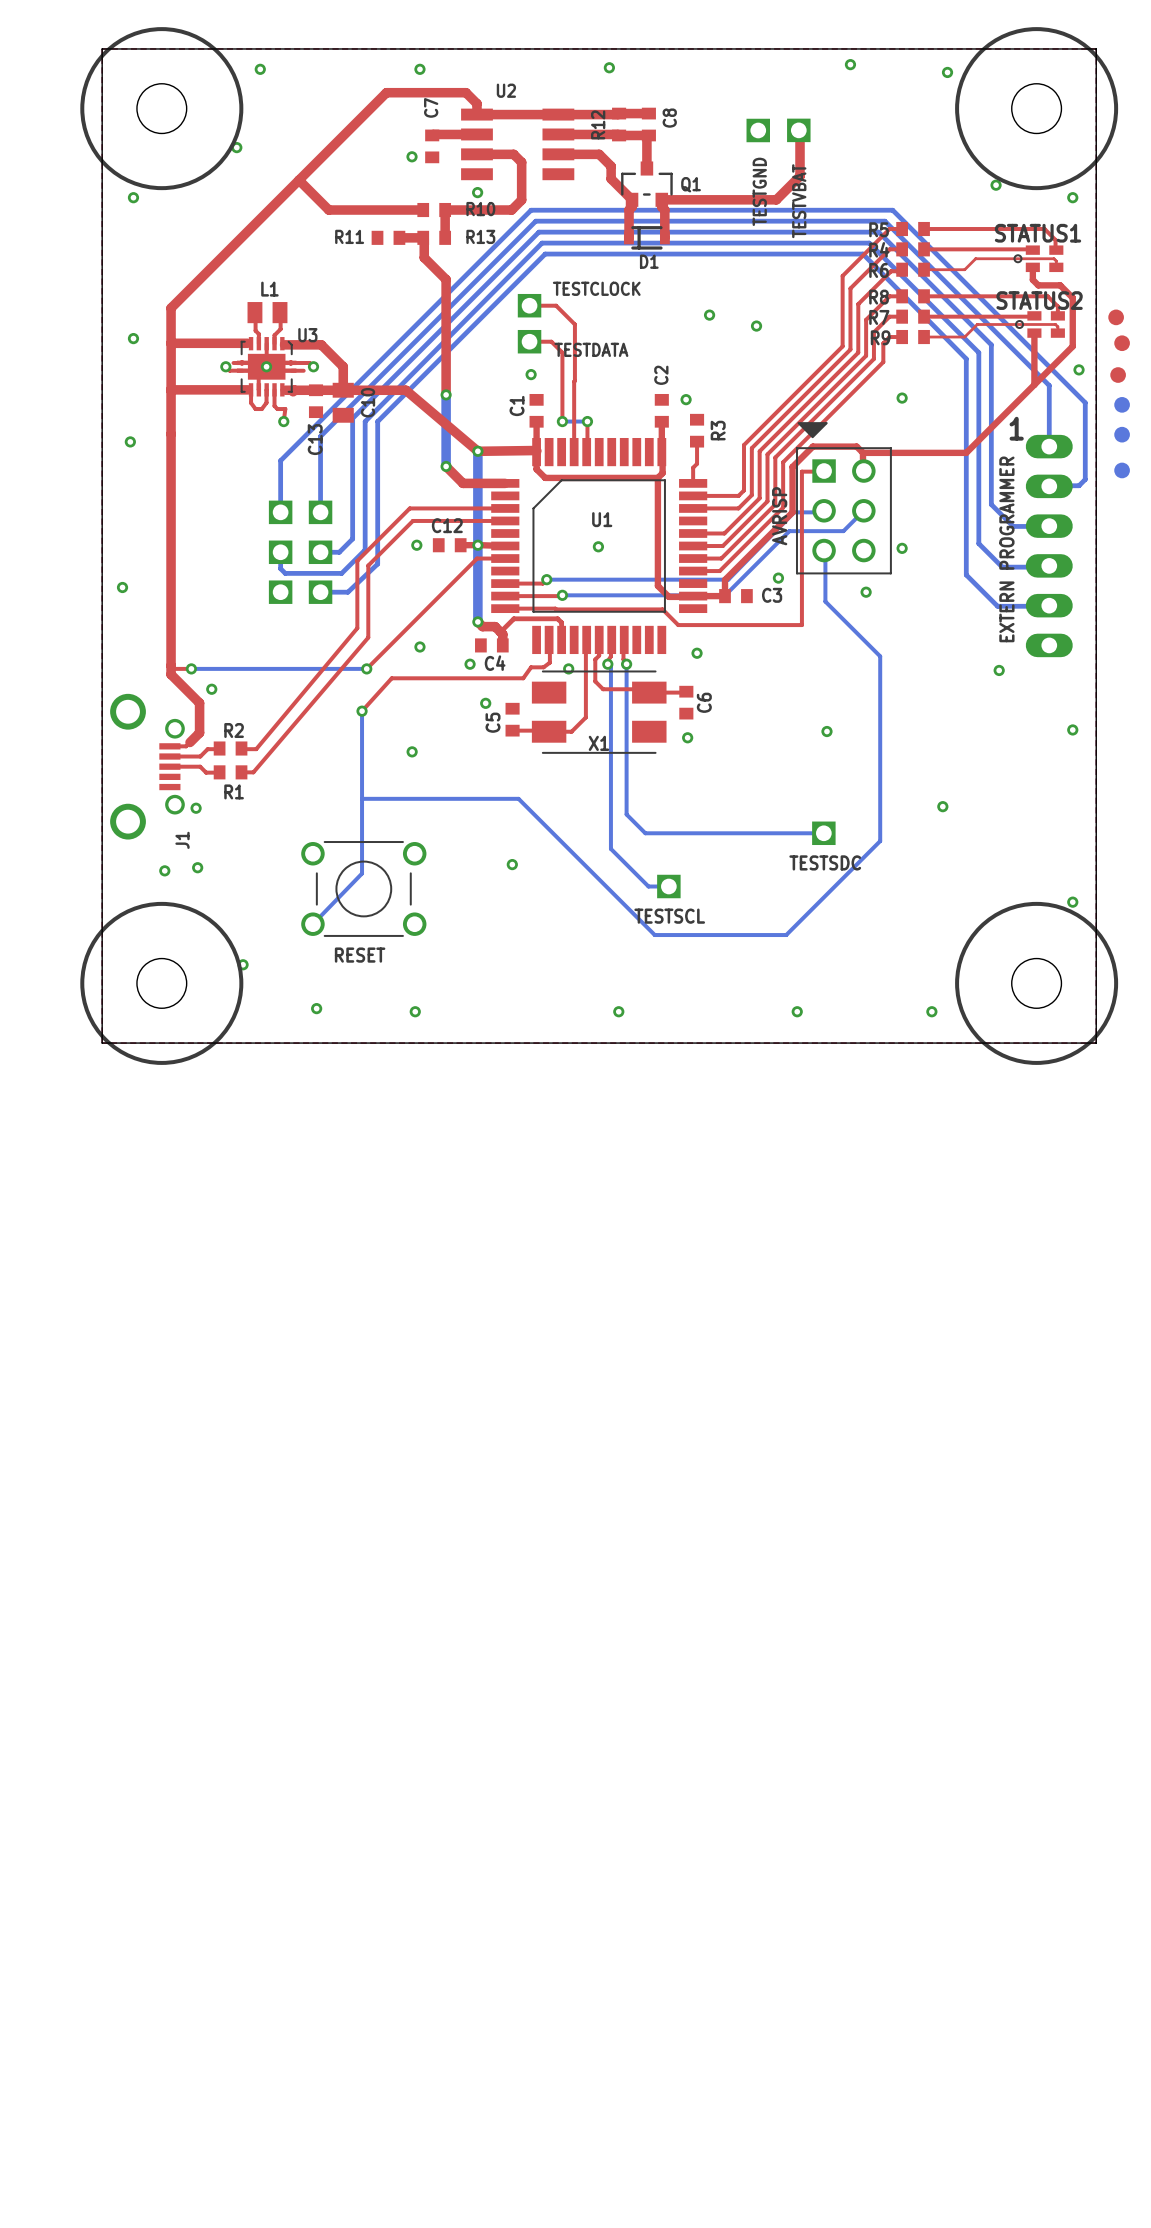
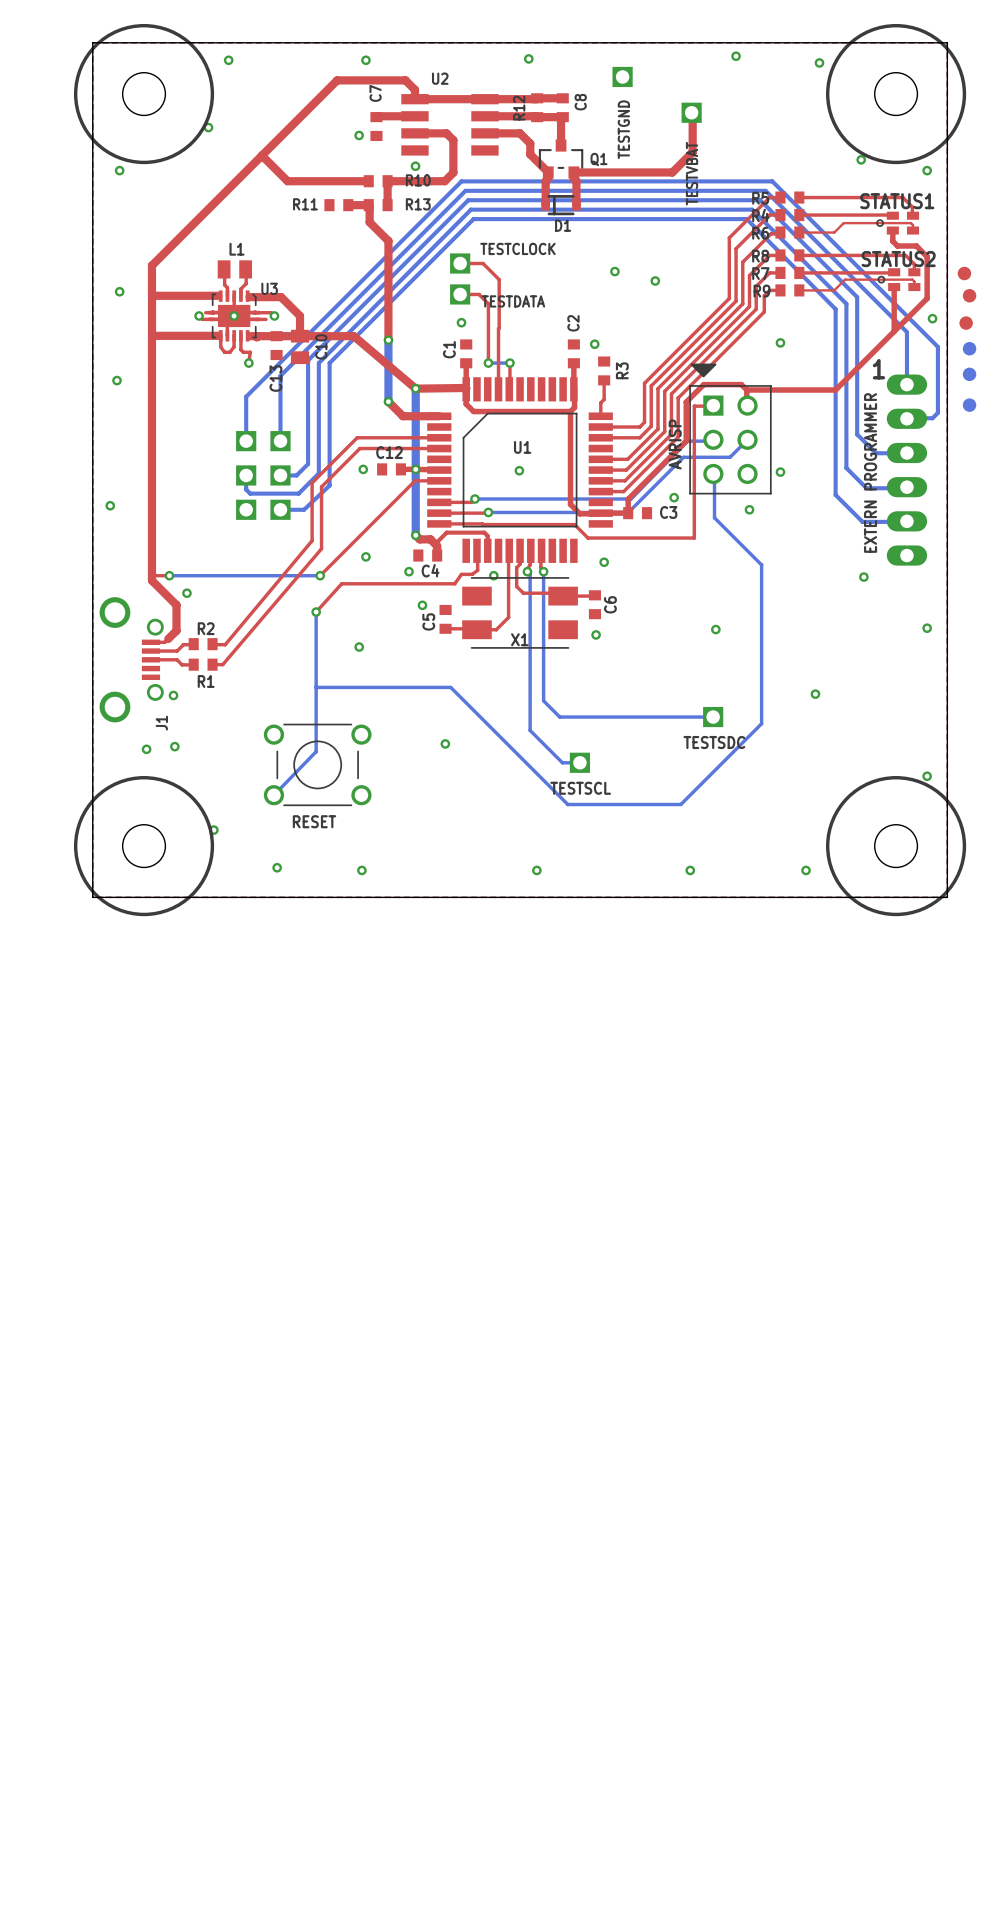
TESTGND position: (758, 130) -> (622, 76)

